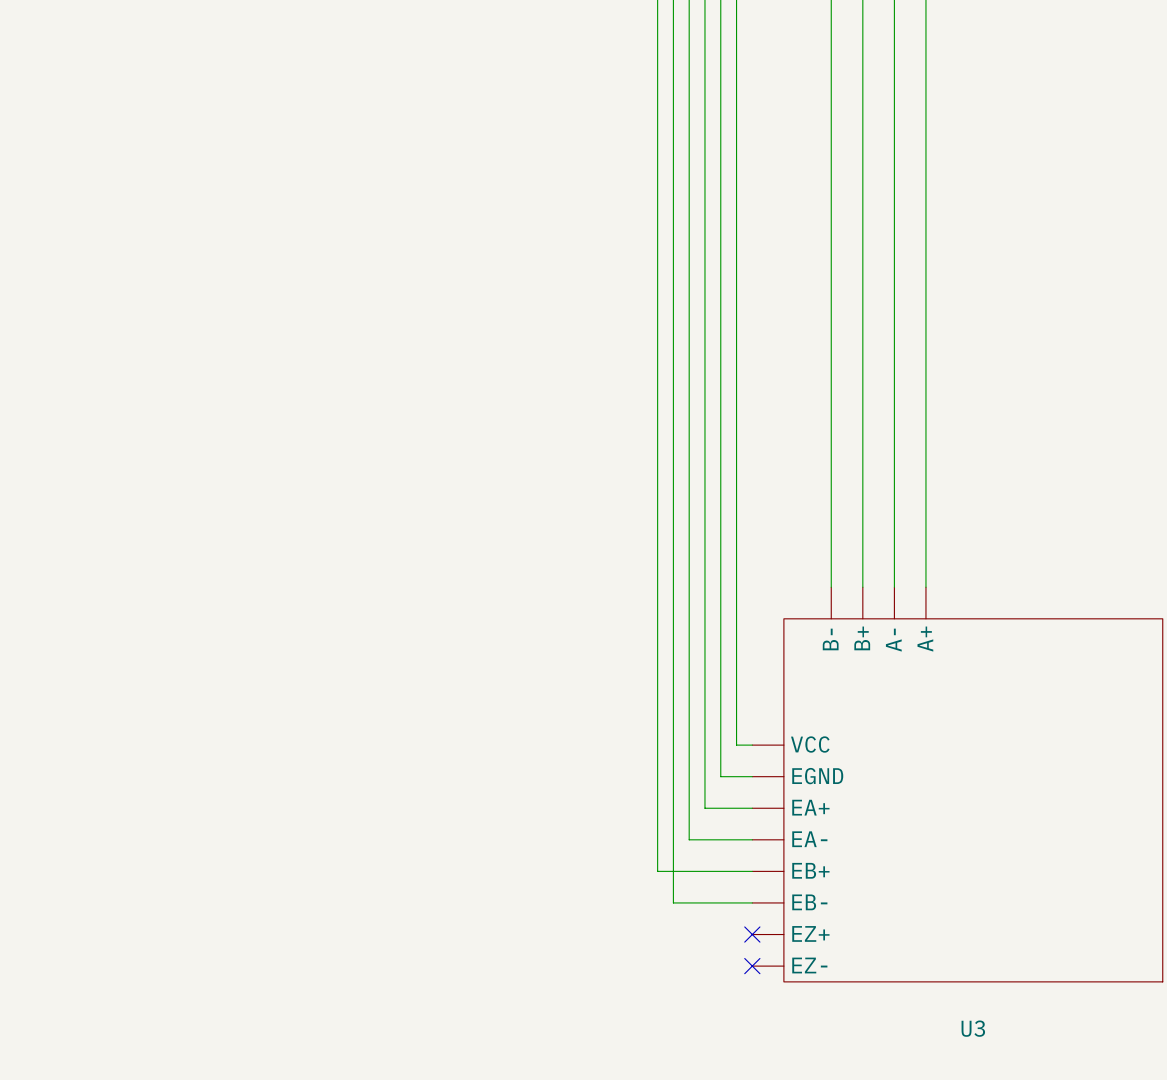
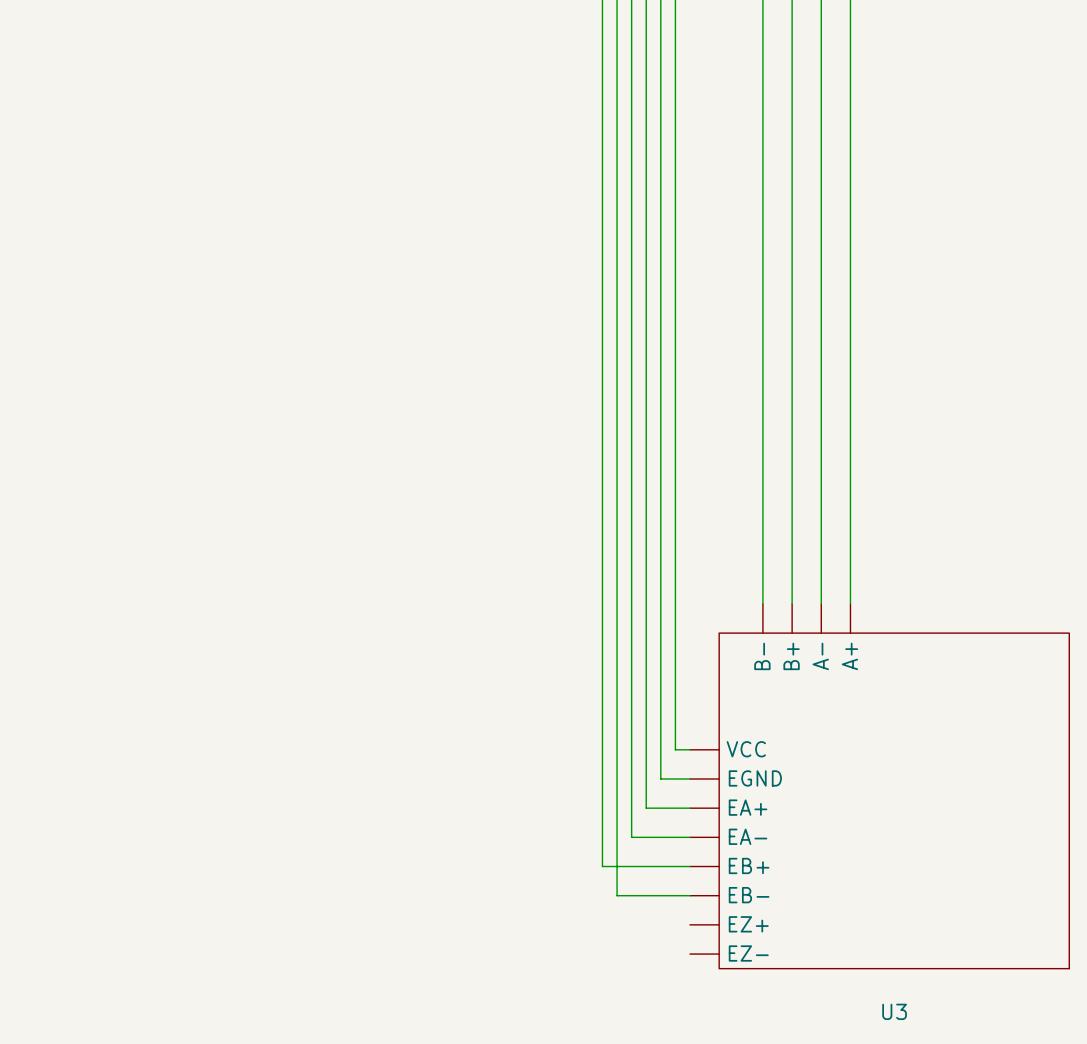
no-connect mark: (752, 934) -> none
no-connect mark: (752, 966) -> none

